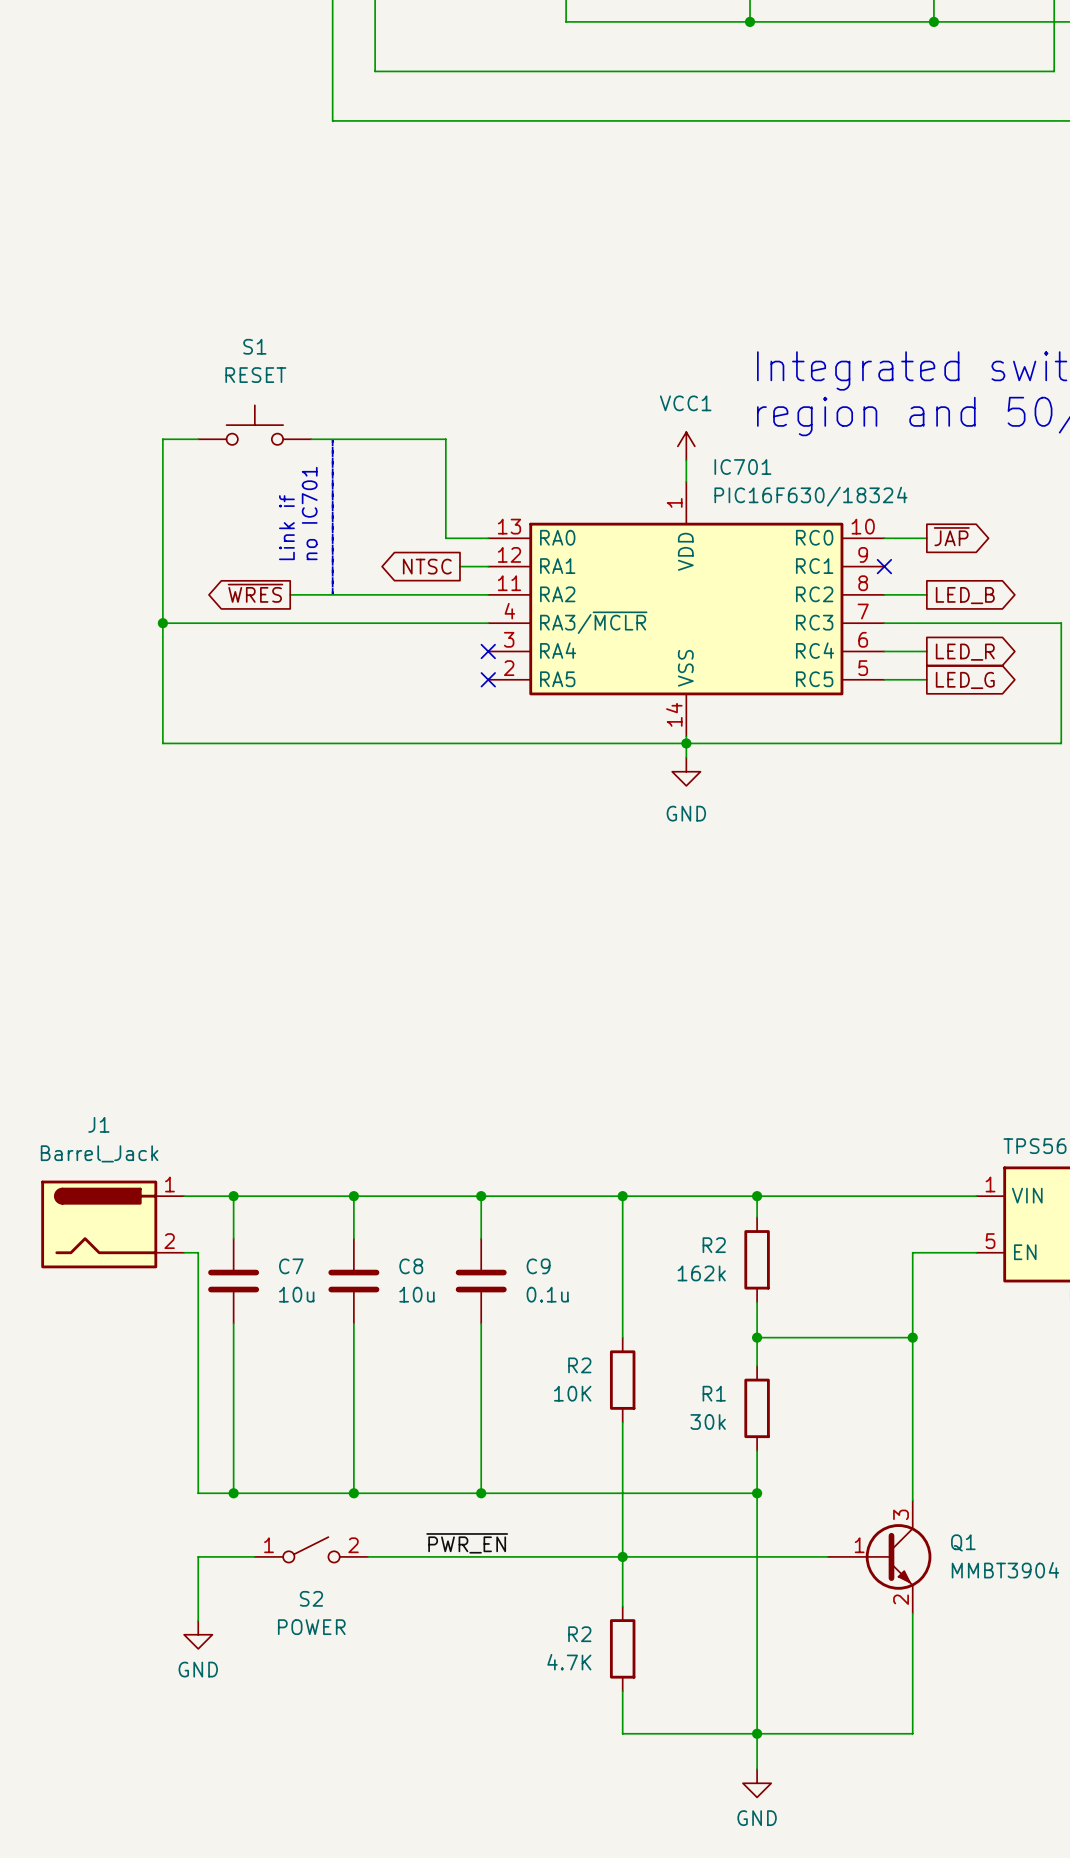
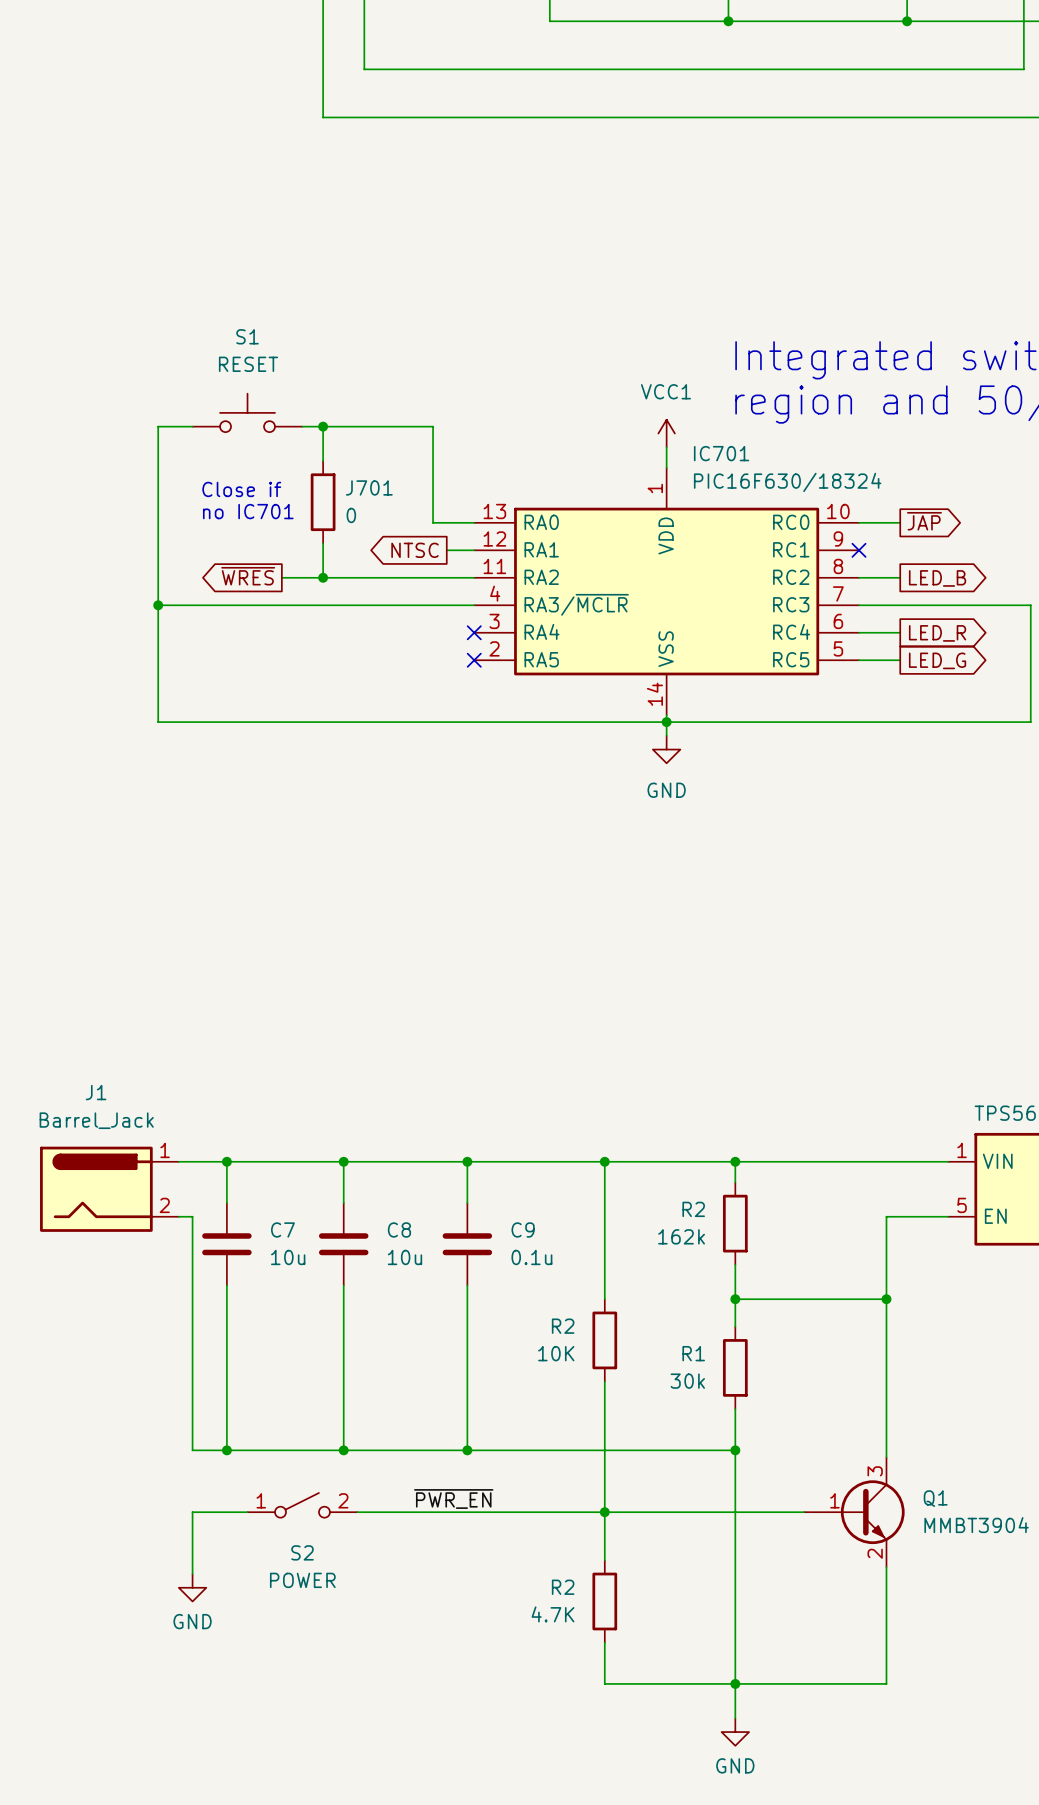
line: (332, 439) (332, 594) -> none
junction: none -> (323, 426)
text: none -> Close if (241, 489)
text rotation: 0° (309, 513) -> 90° clockwise (248, 511)
J701: none -> 0 (323, 502)
text: Link if (286, 527) -> none
junction: none -> (323, 577)

